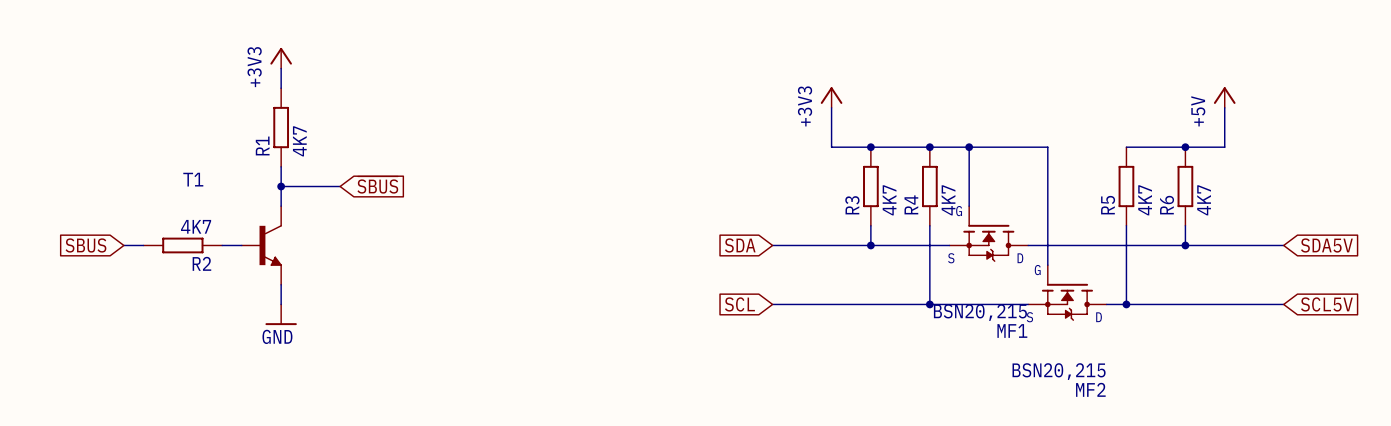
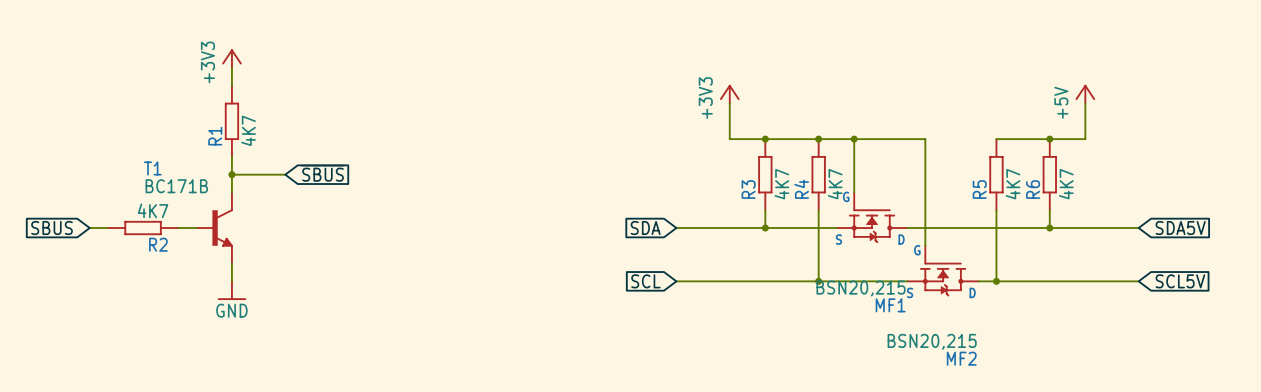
T1 value: none -> BC171B (176, 186)

